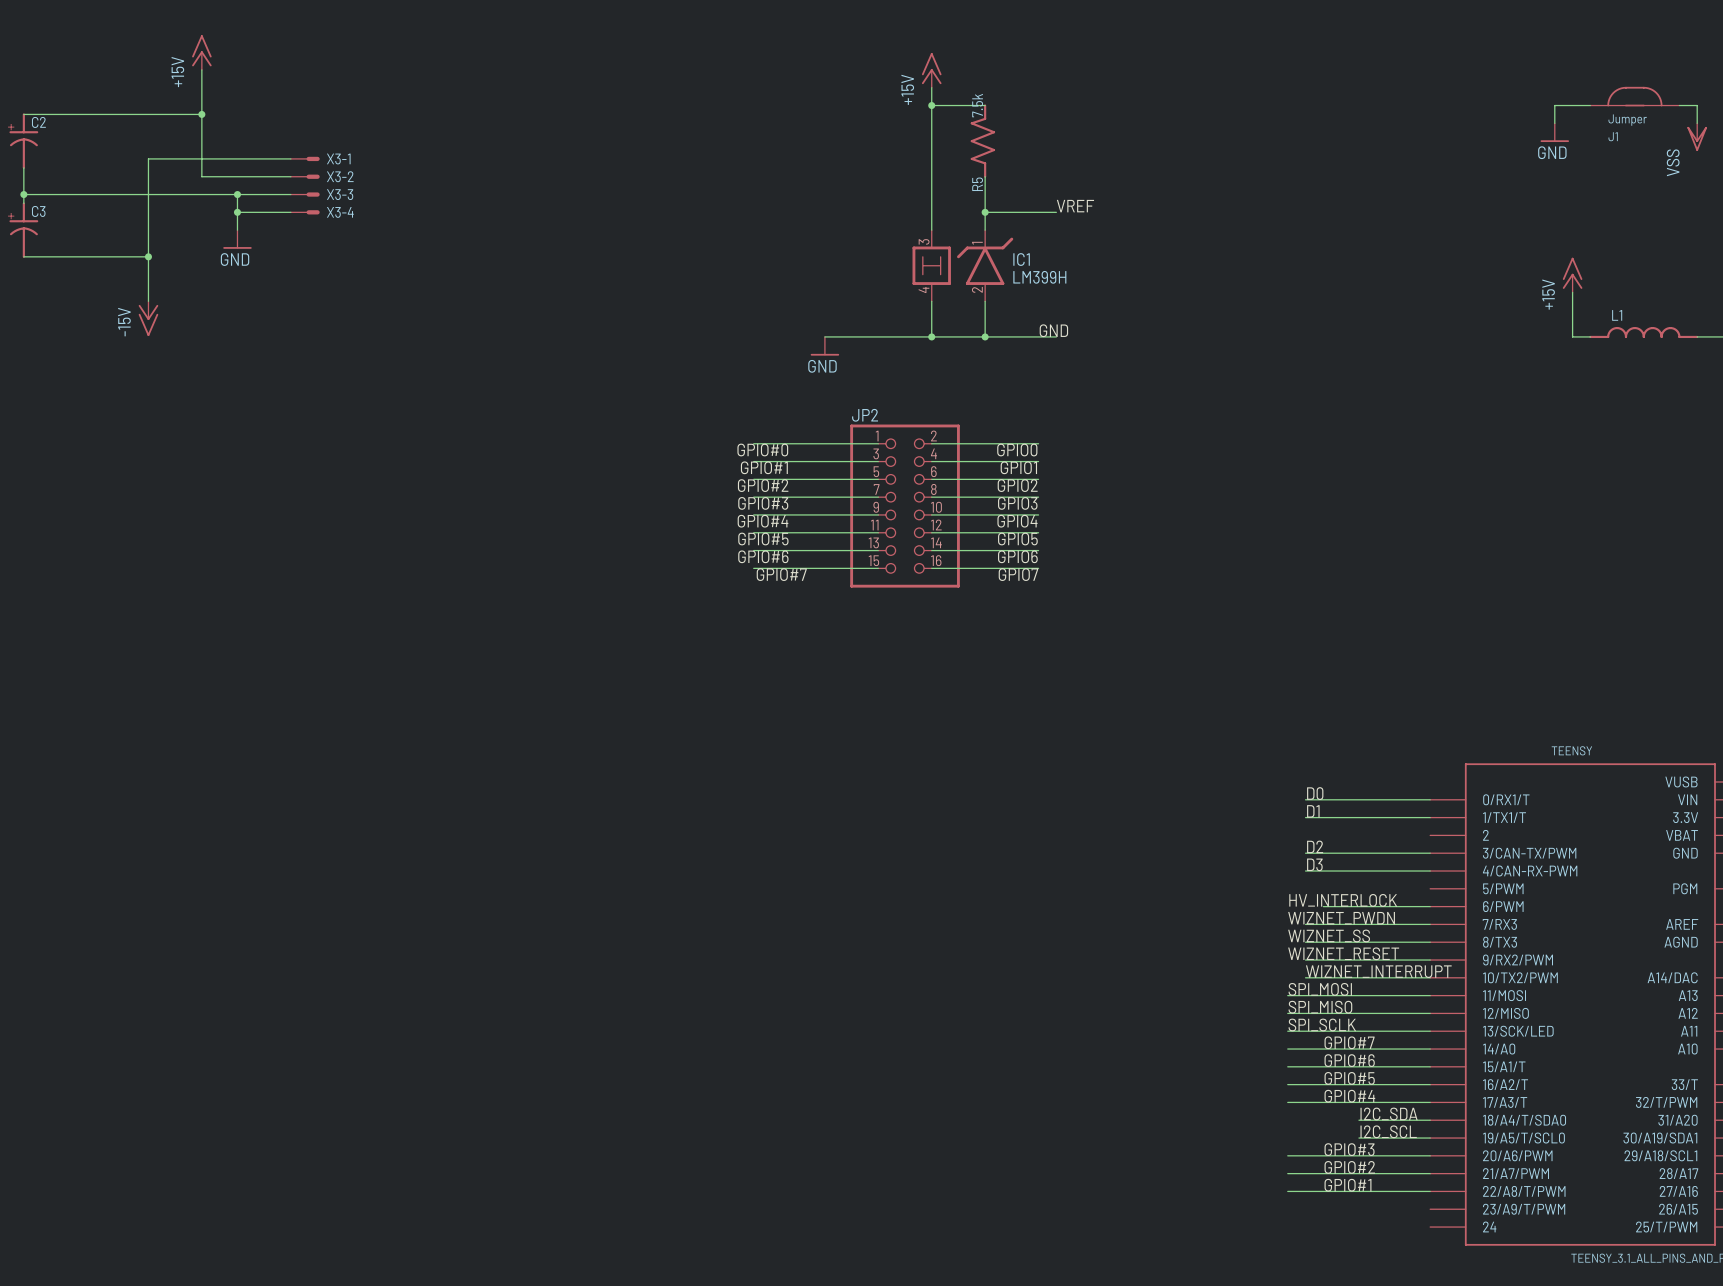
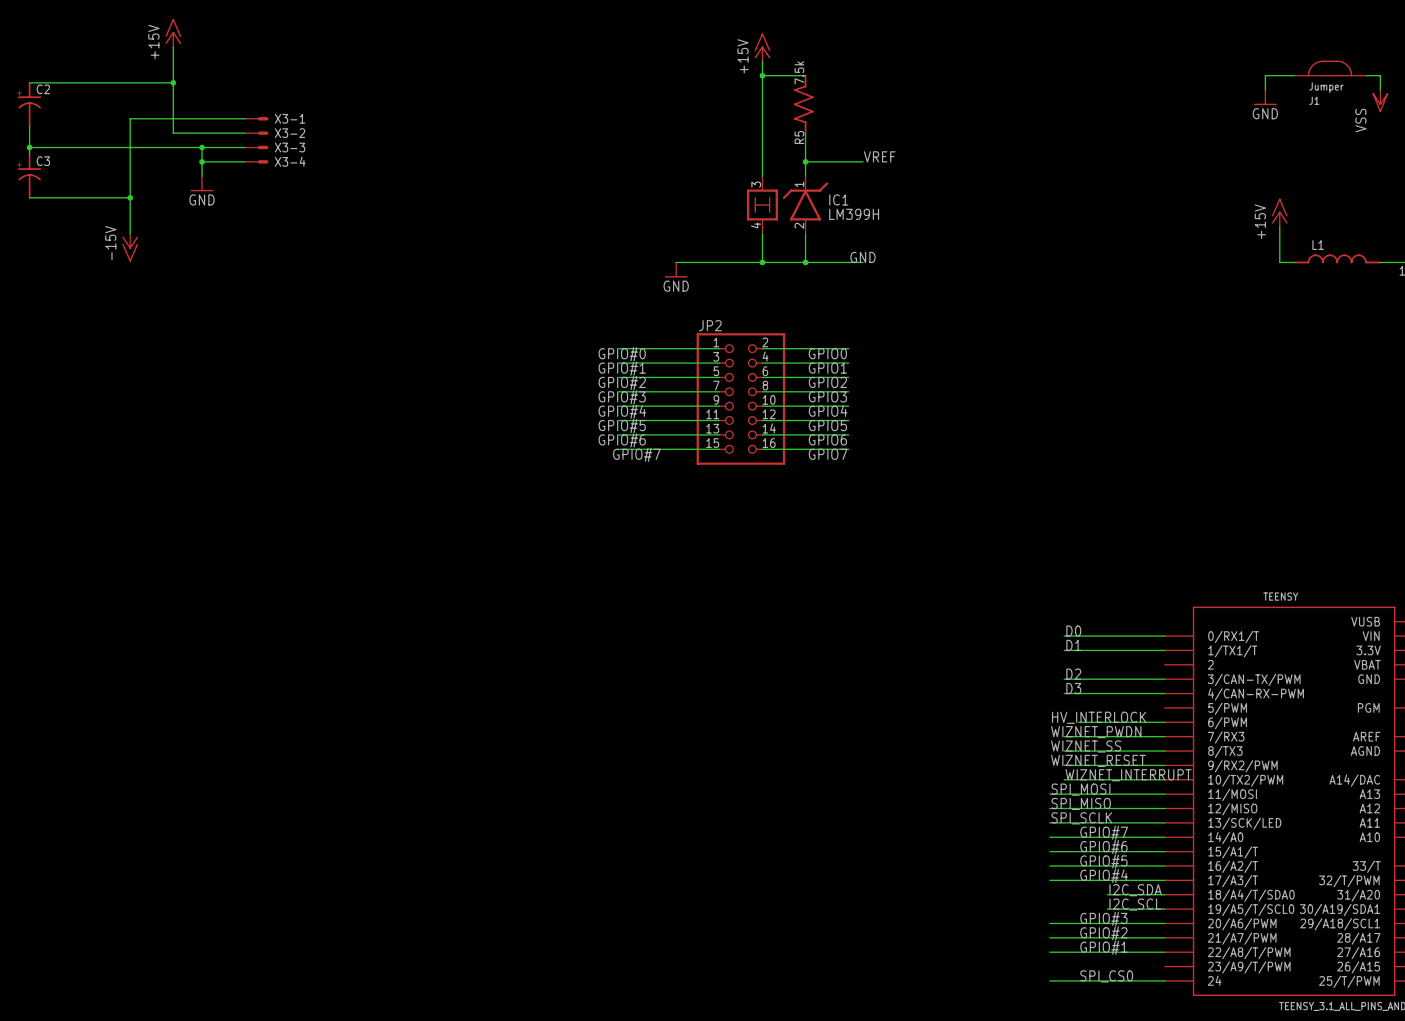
label: none -> SPI_CS0 (1106, 976)
wire: none -> (1049, 980) (1164, 980)

